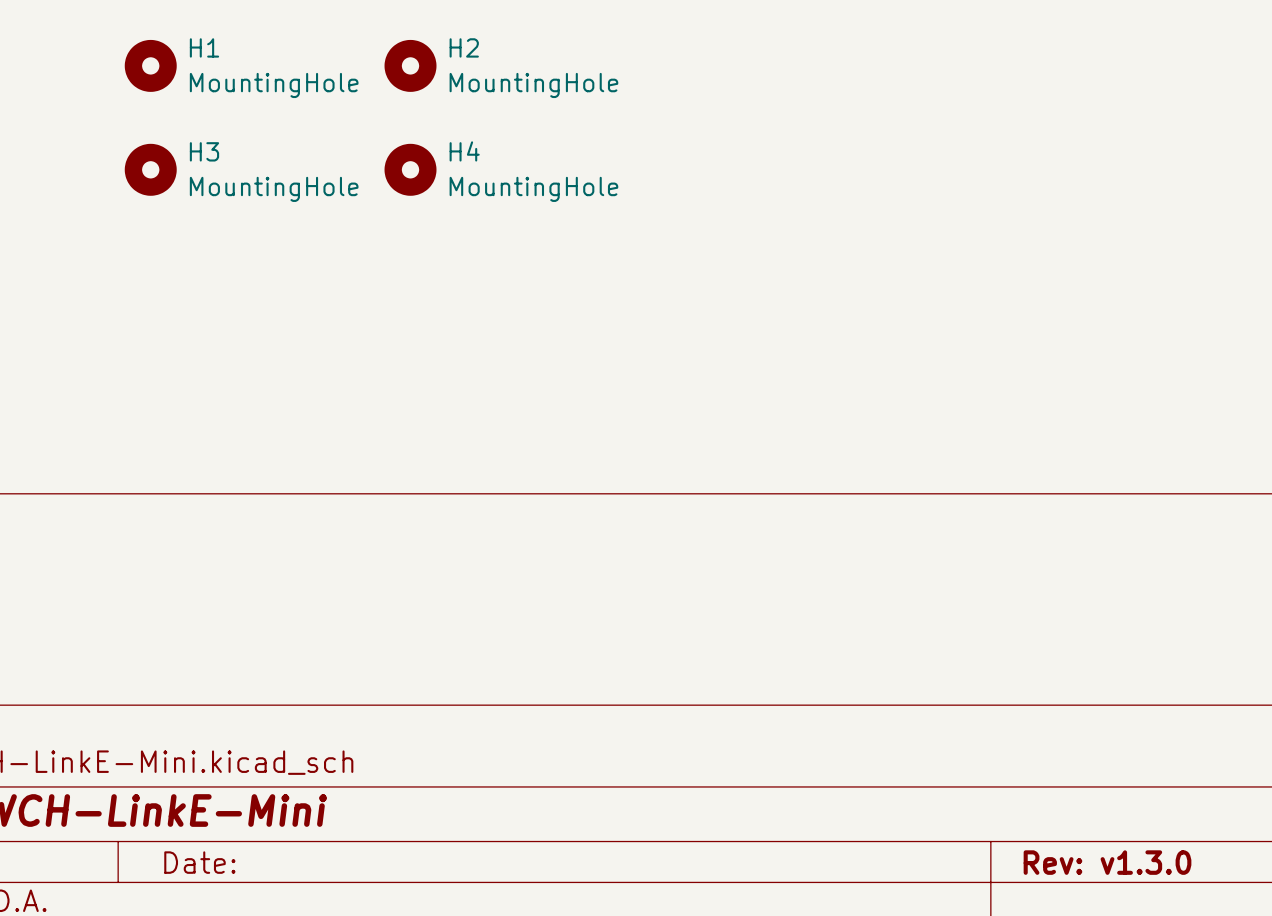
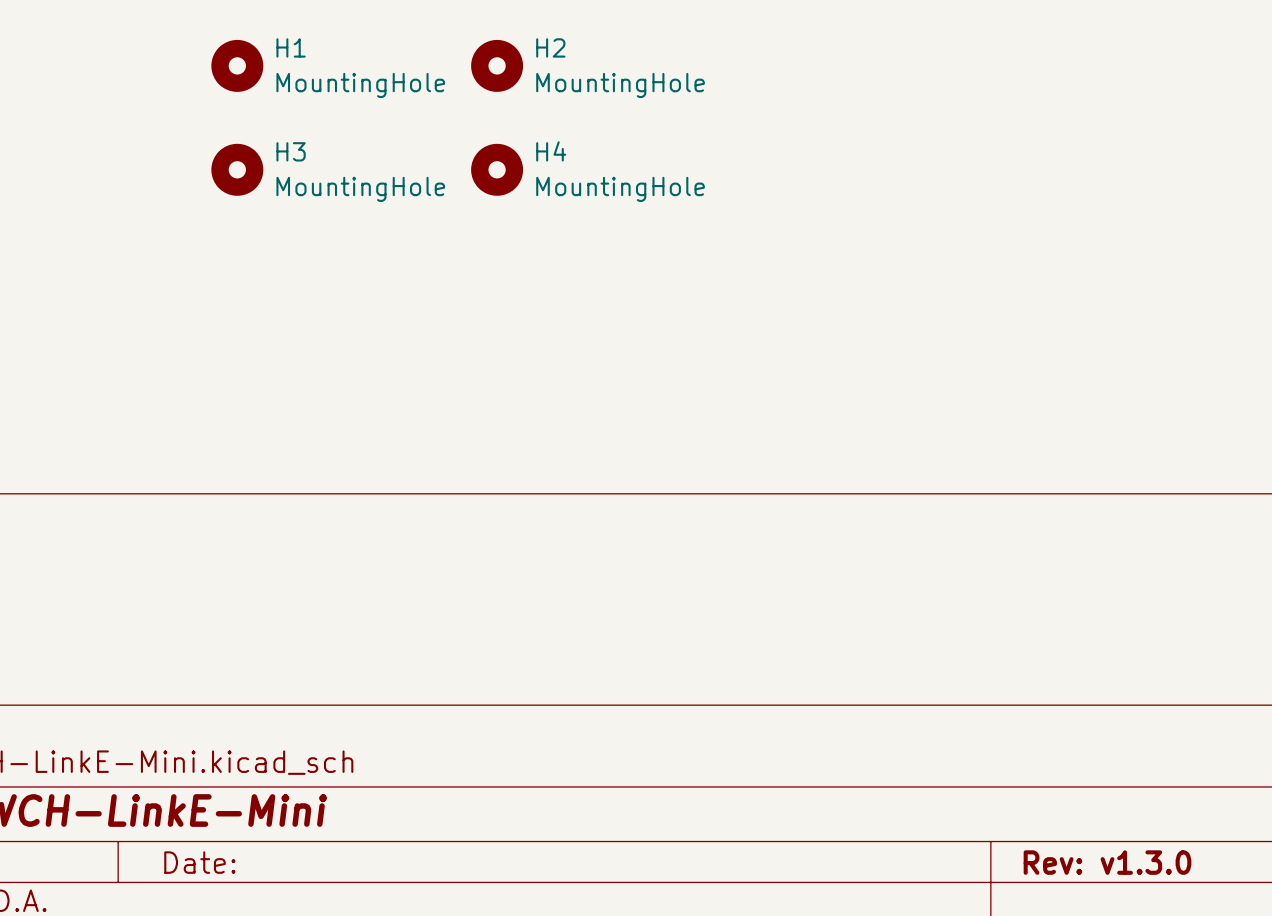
H1 position: (150, 65) -> (237, 65)
H2 position: (410, 65) -> (497, 65)
H3 position: (150, 169) -> (237, 169)
H4 position: (410, 169) -> (497, 169)

